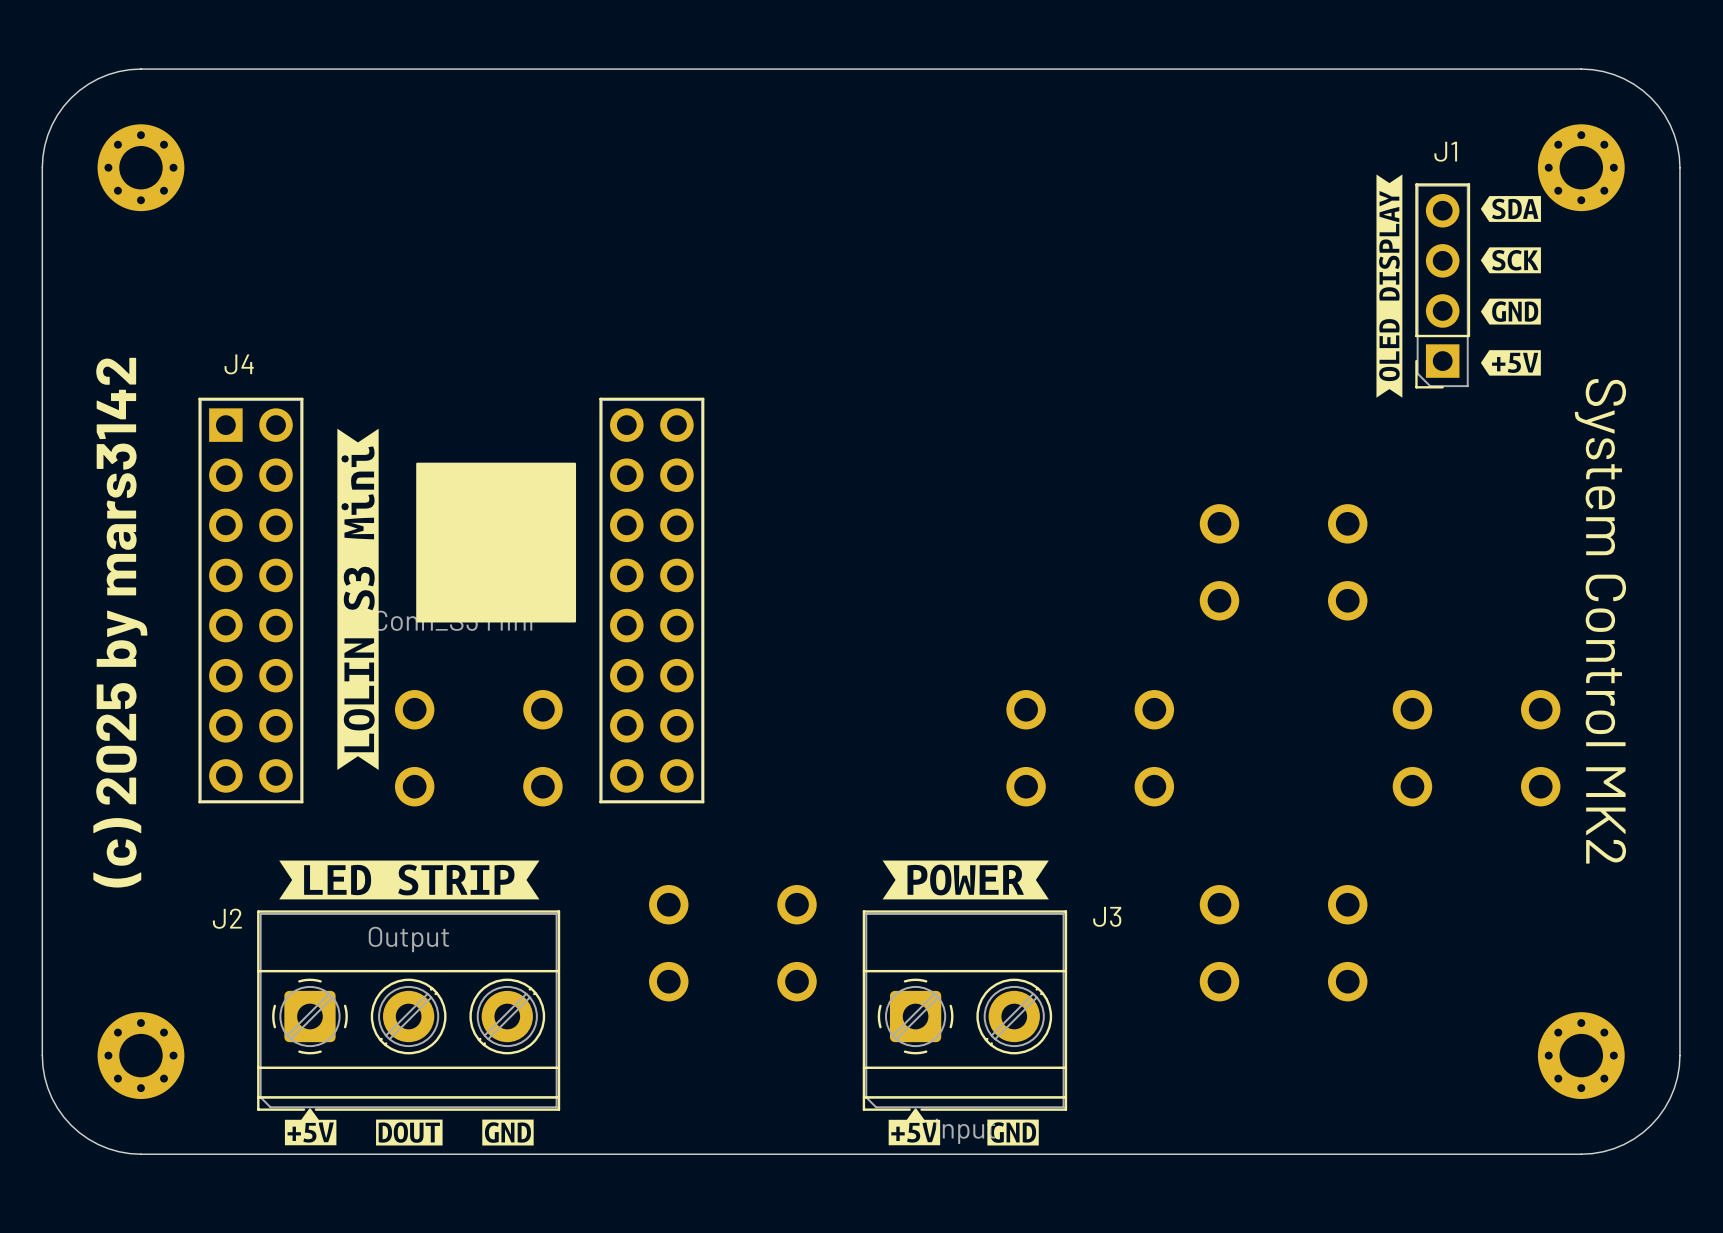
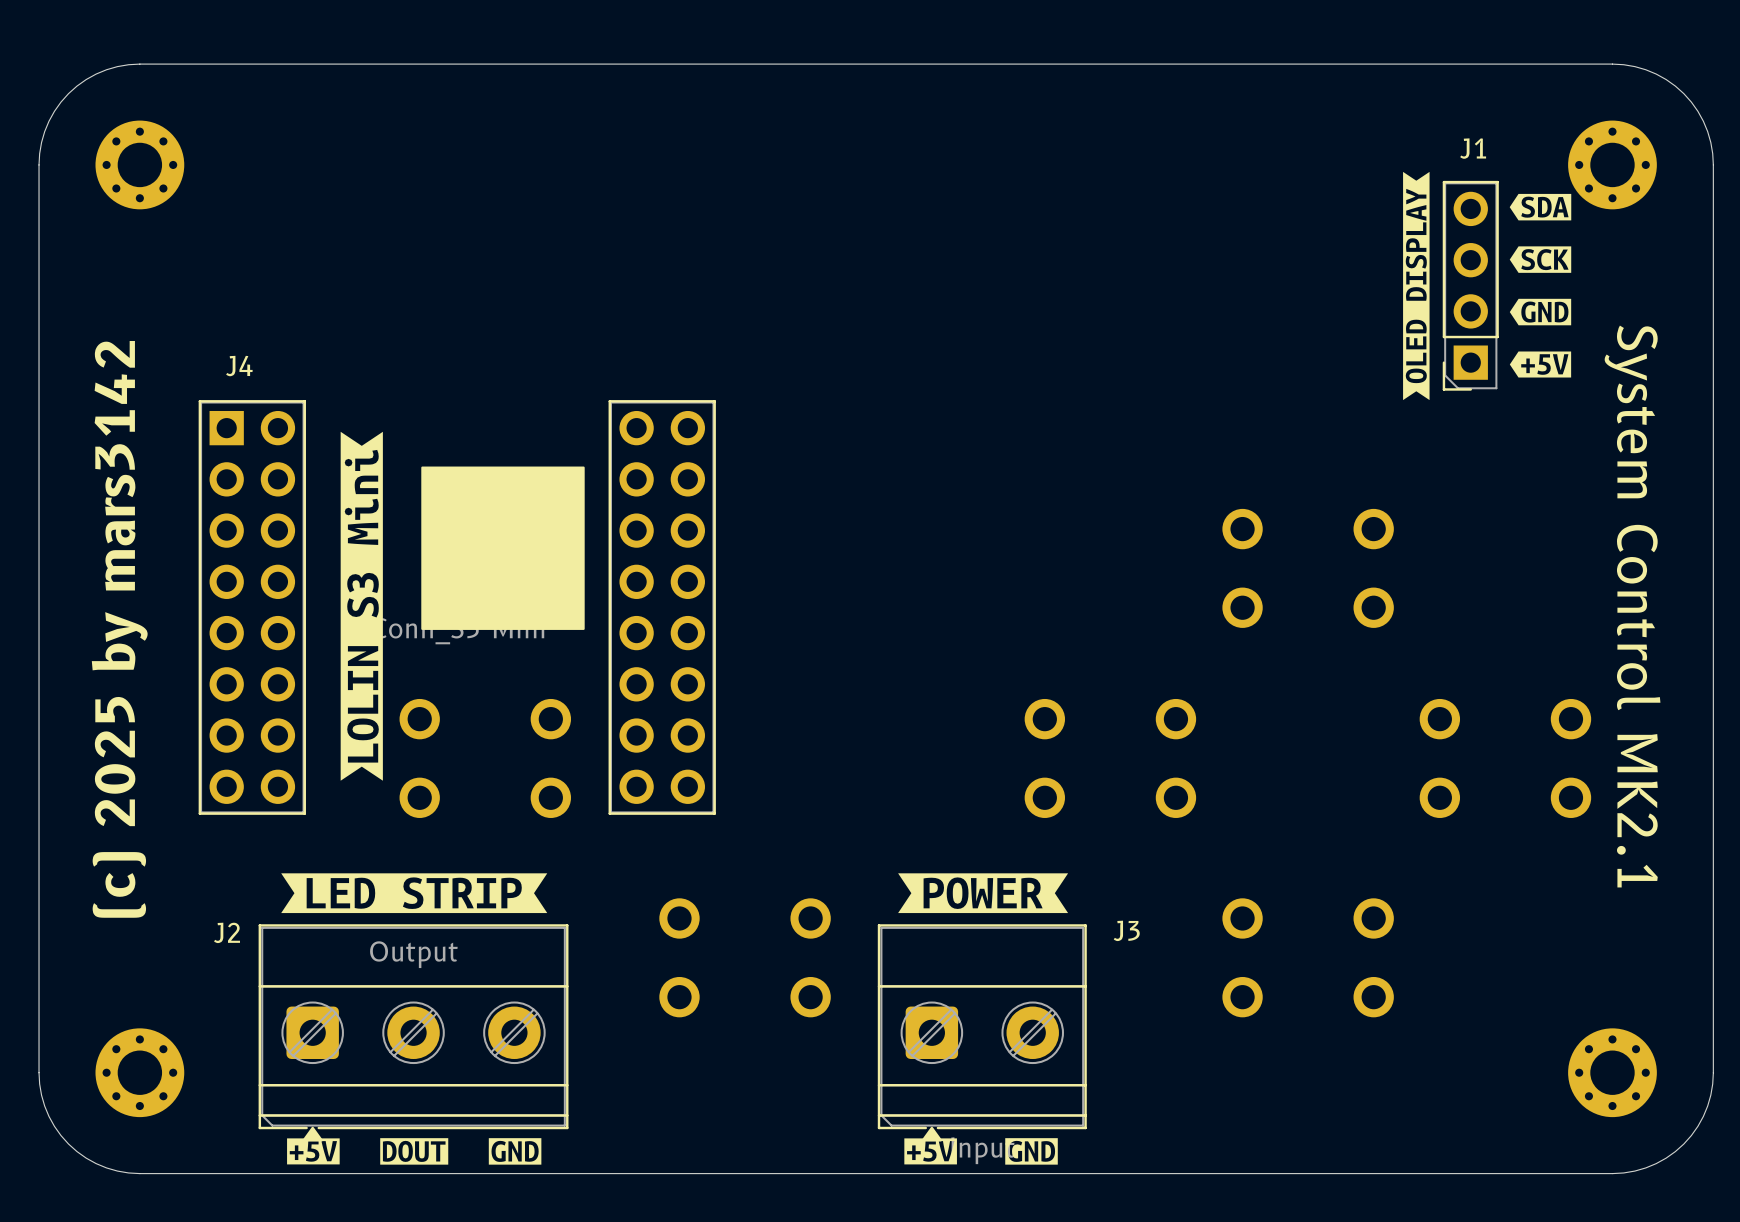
text: System Control MK2 (1600, 621) -> System Control MK2.1 (1632, 606)
J2 footprint: [257, 910, 561, 1123] -> [258, 924, 569, 1142]
J3 footprint: [862, 910, 1068, 1123] -> [877, 924, 1087, 1142]

